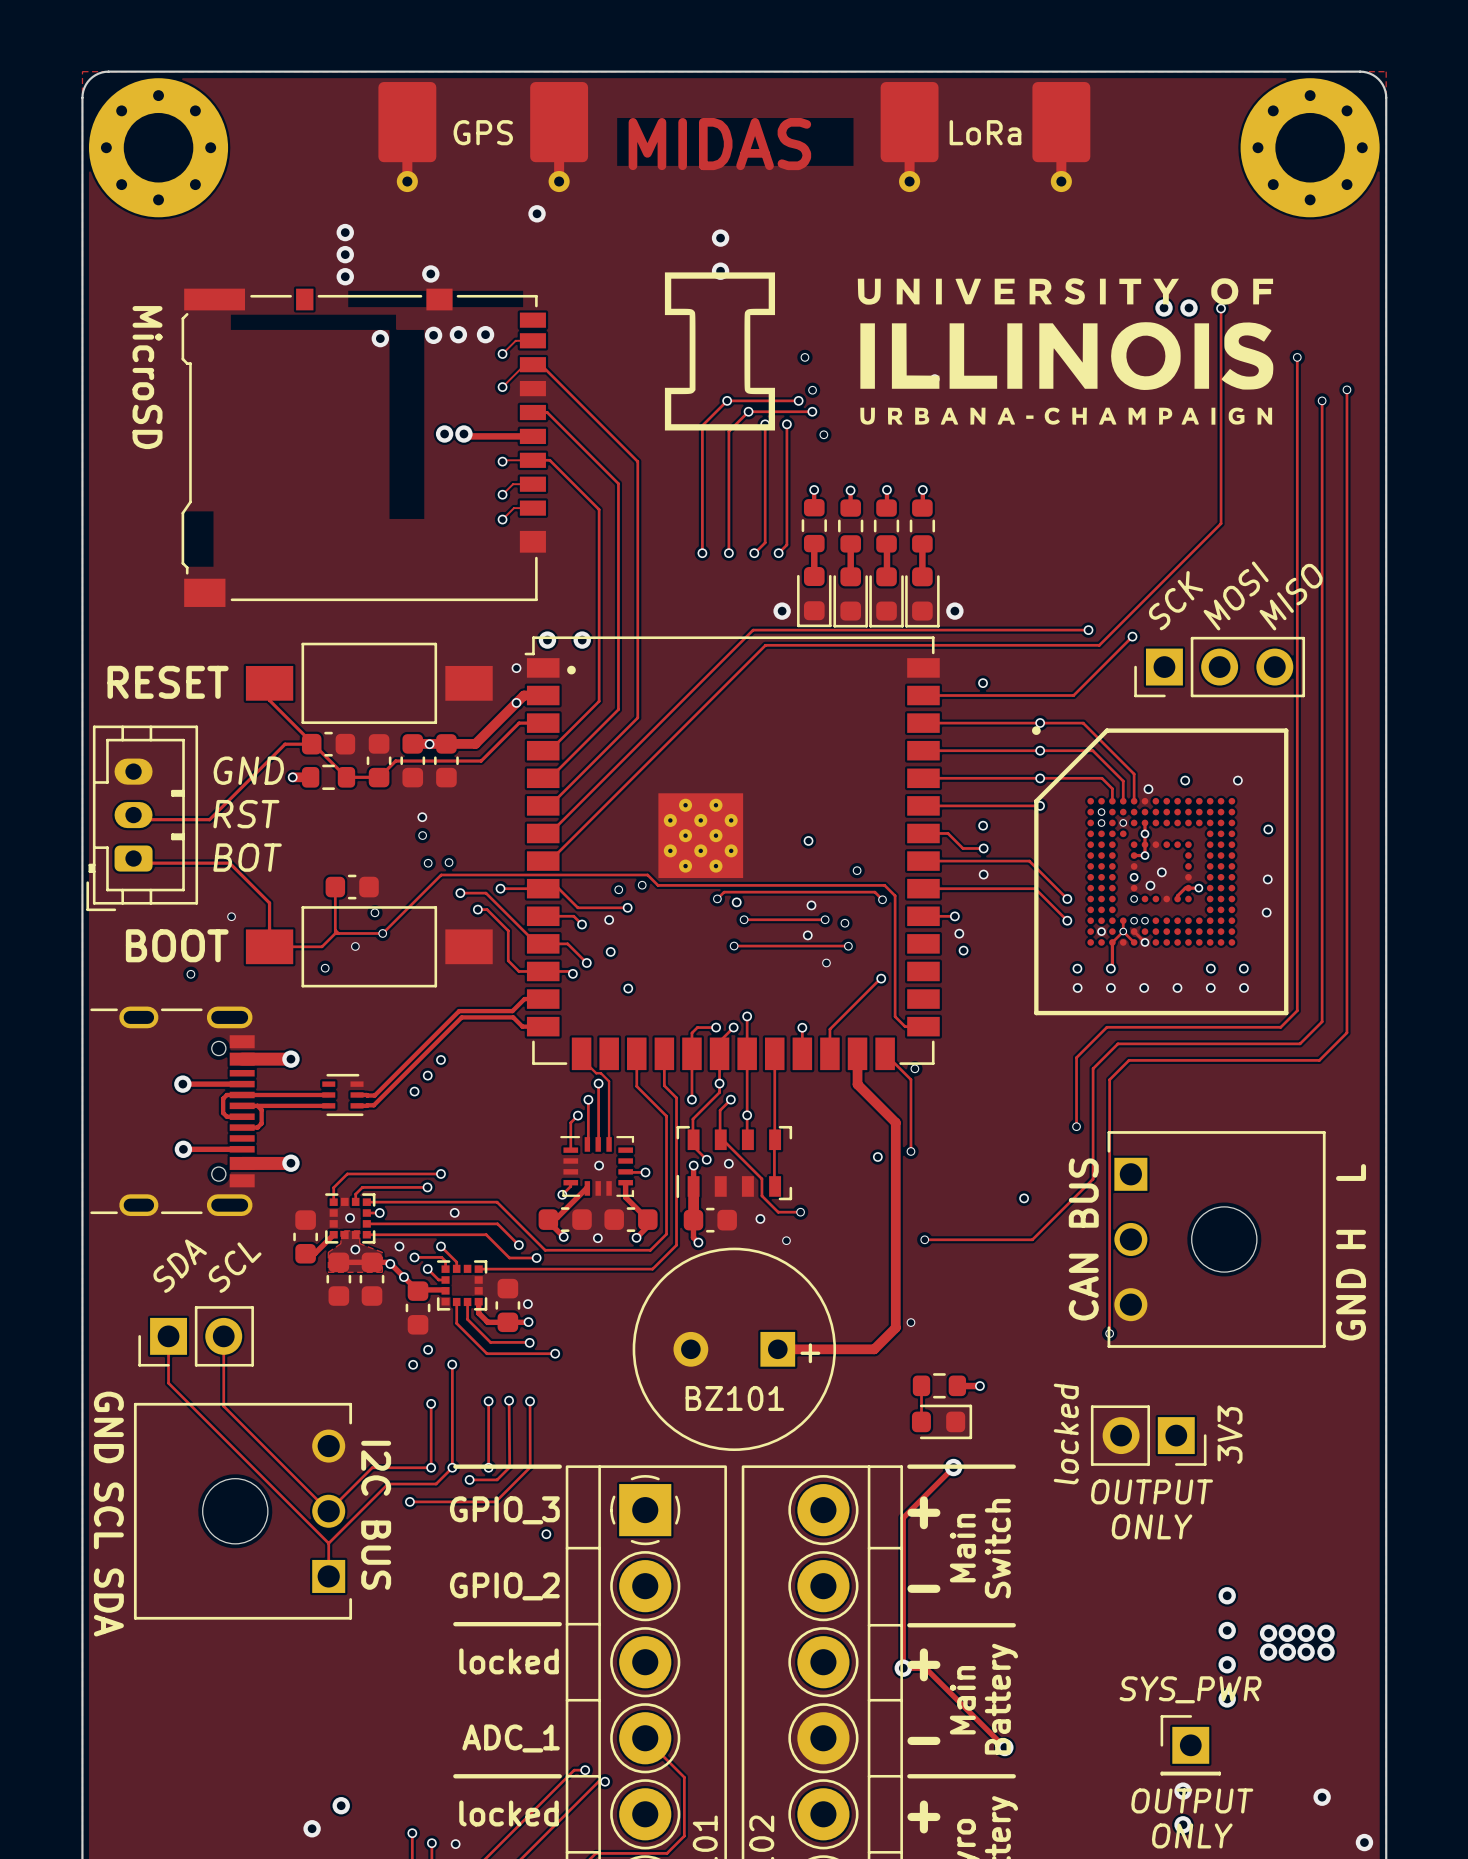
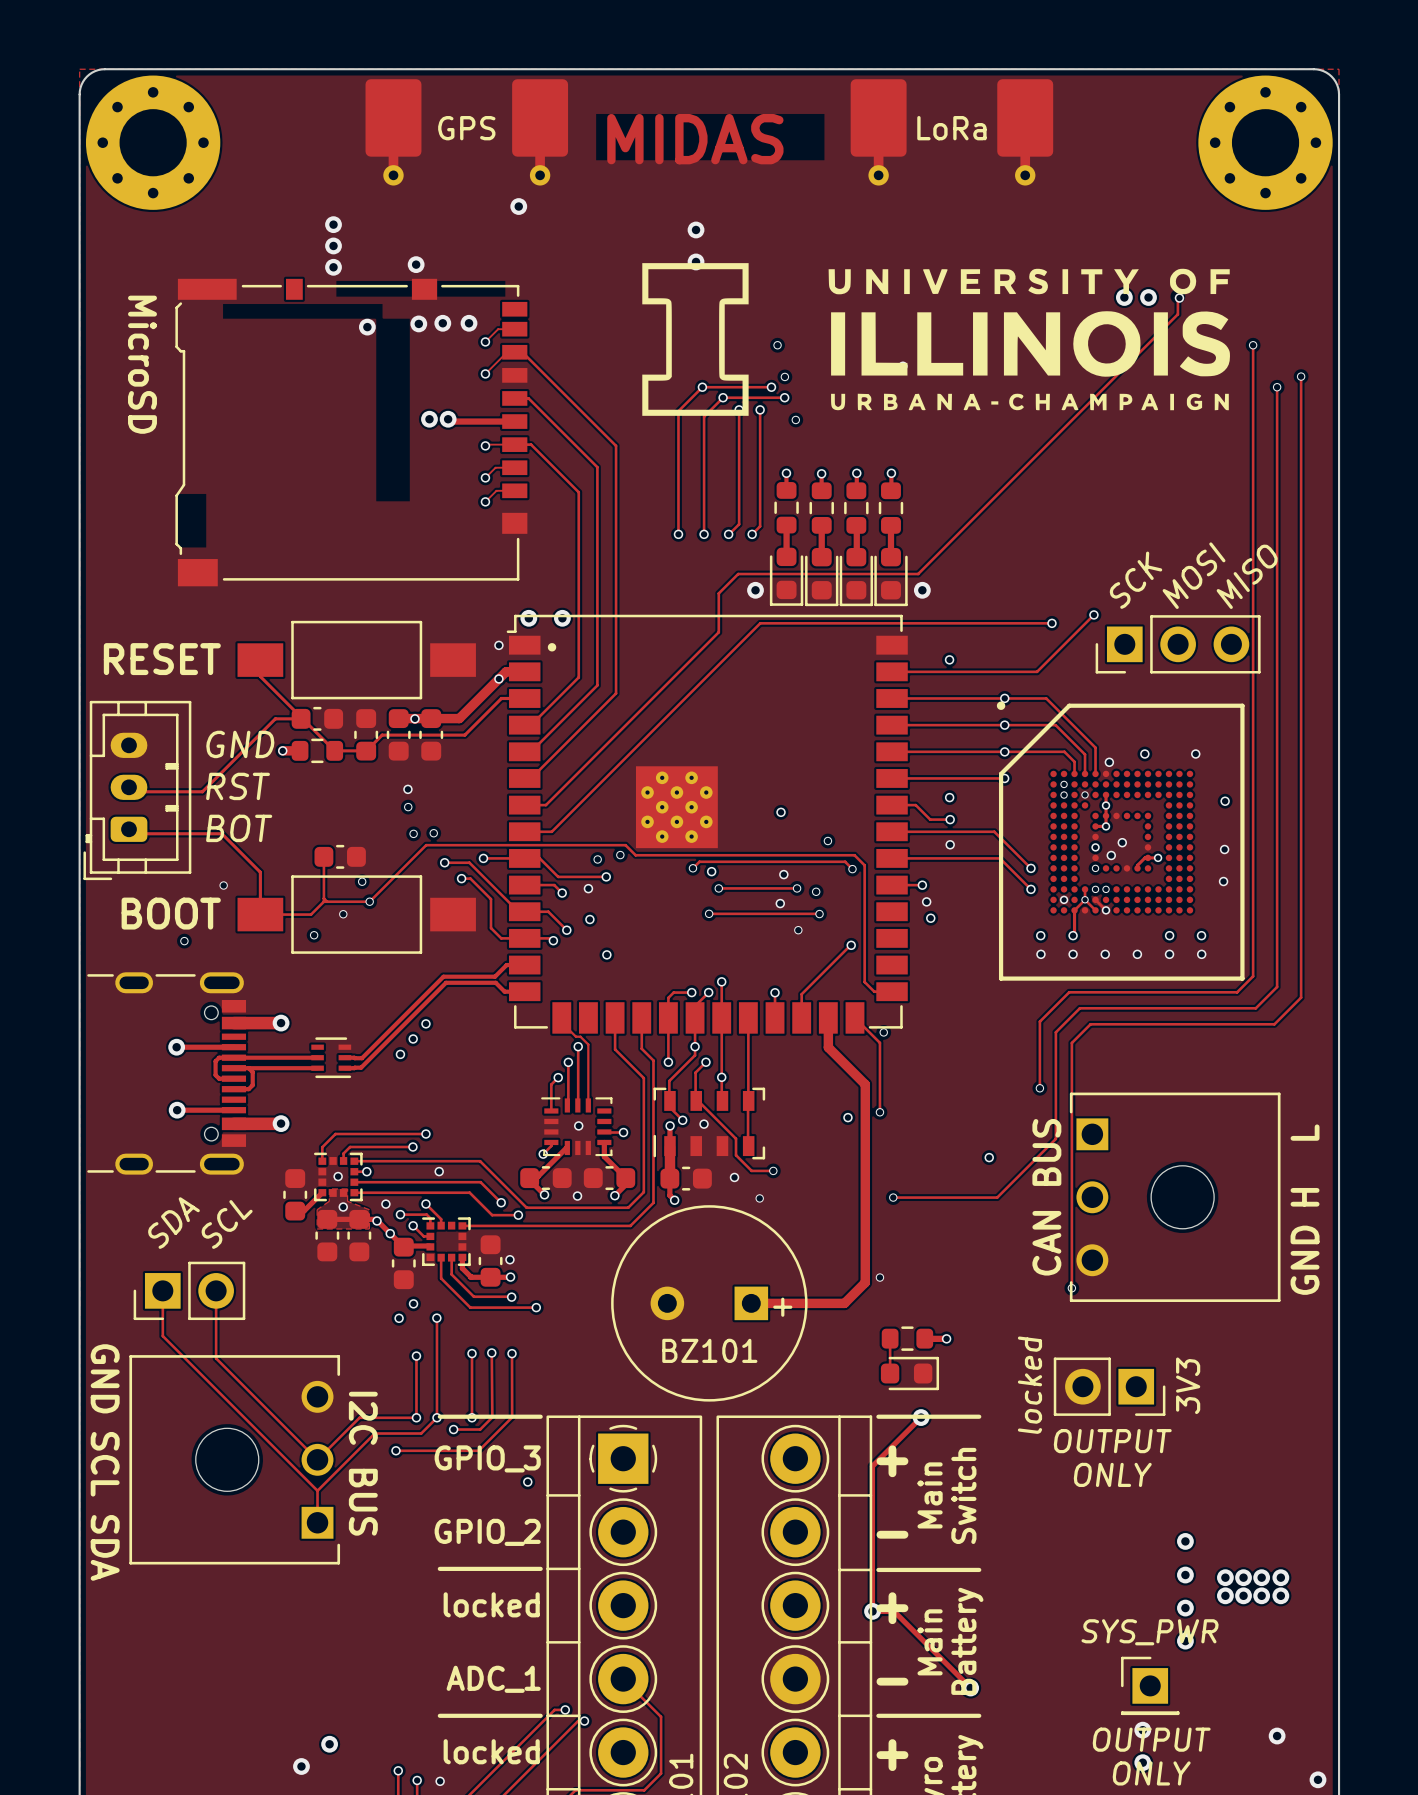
track: (1221, 308) (1221, 523) (1099, 645) (1089, 645) -> none
track: (1088, 630) (753, 630) (549, 833) -> (1177, 296) (1177, 314) (918, 574) (738, 574) (718, 593) (718, 632) (545, 805) (531, 805)
via position: (1088, 630) -> (1051, 623)
track: (787, 645) (765, 645) (549, 861) -> (760, 623) (551, 831) (531, 831)

